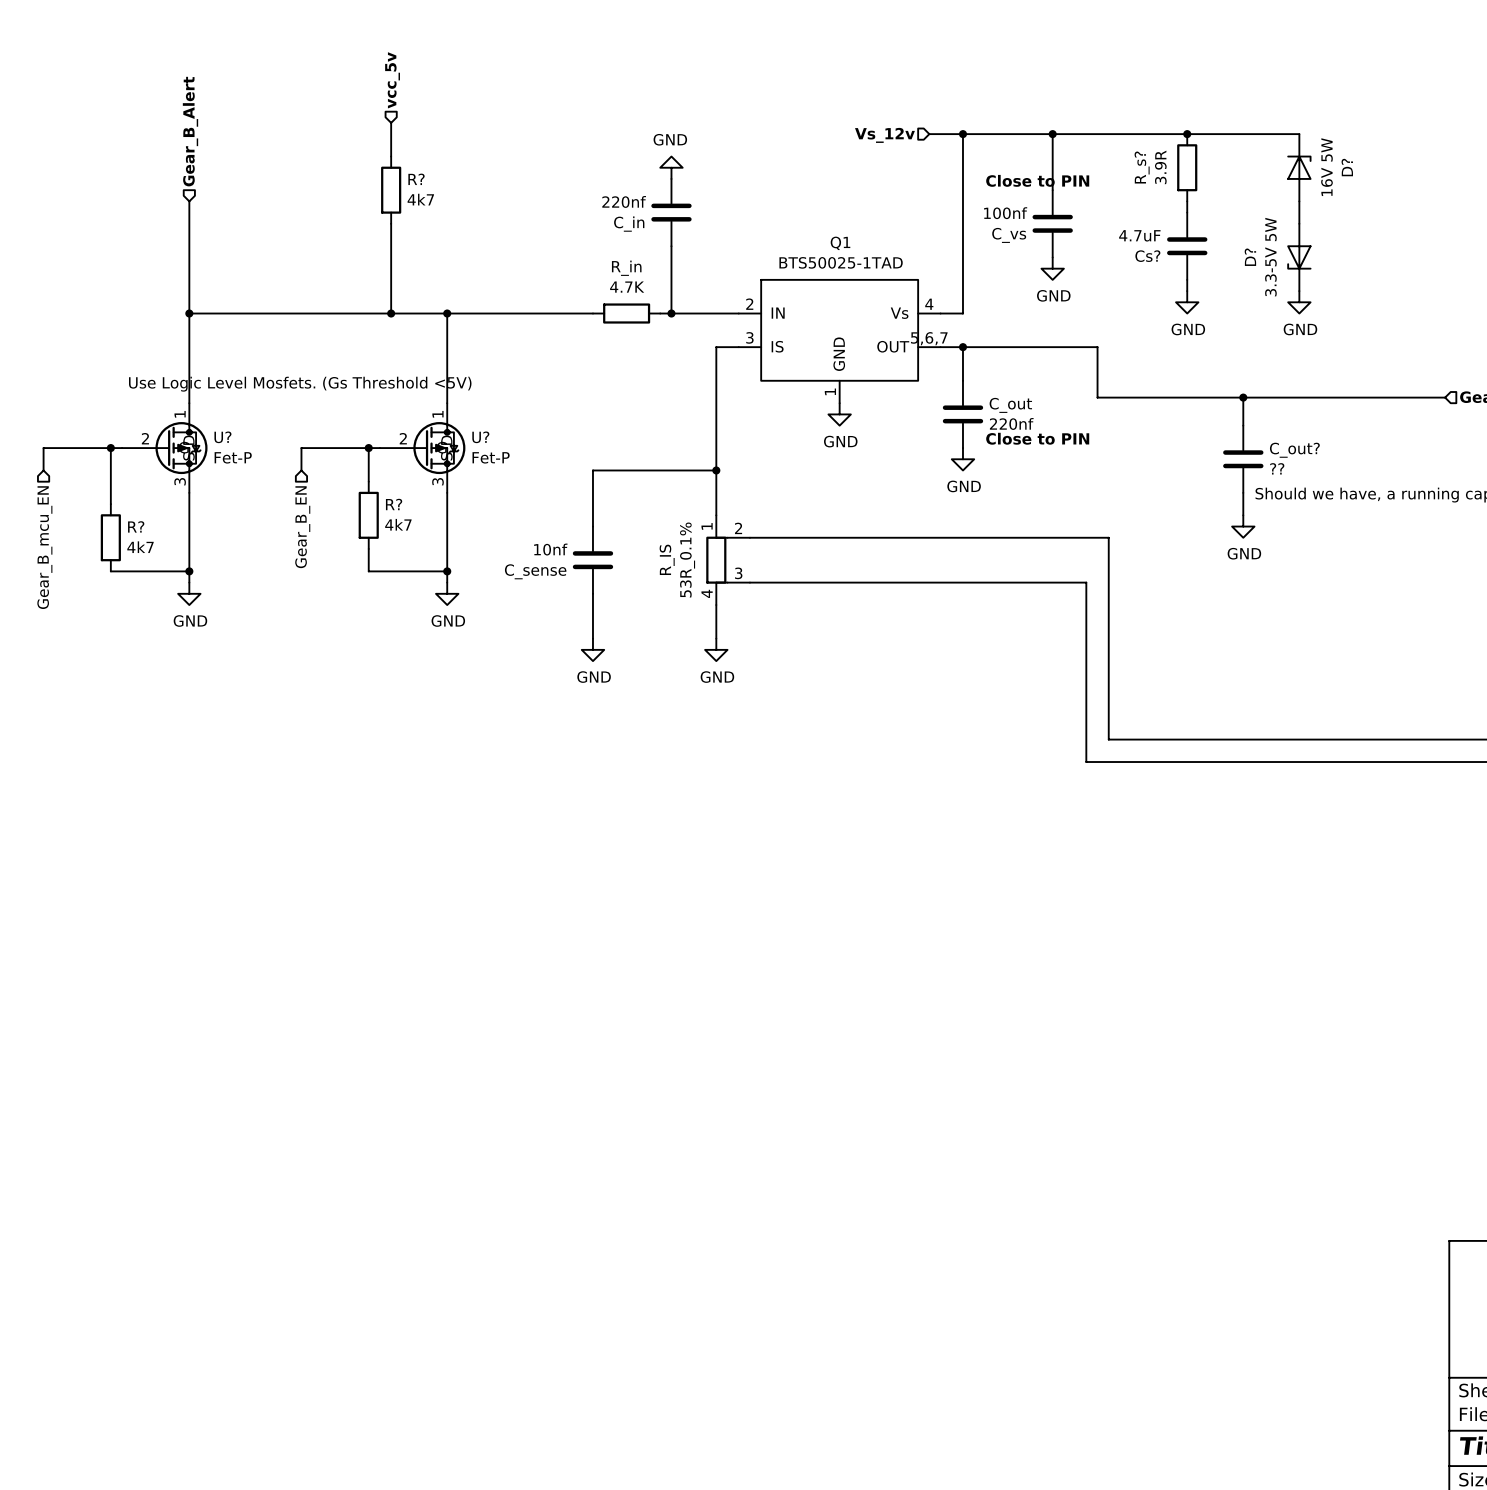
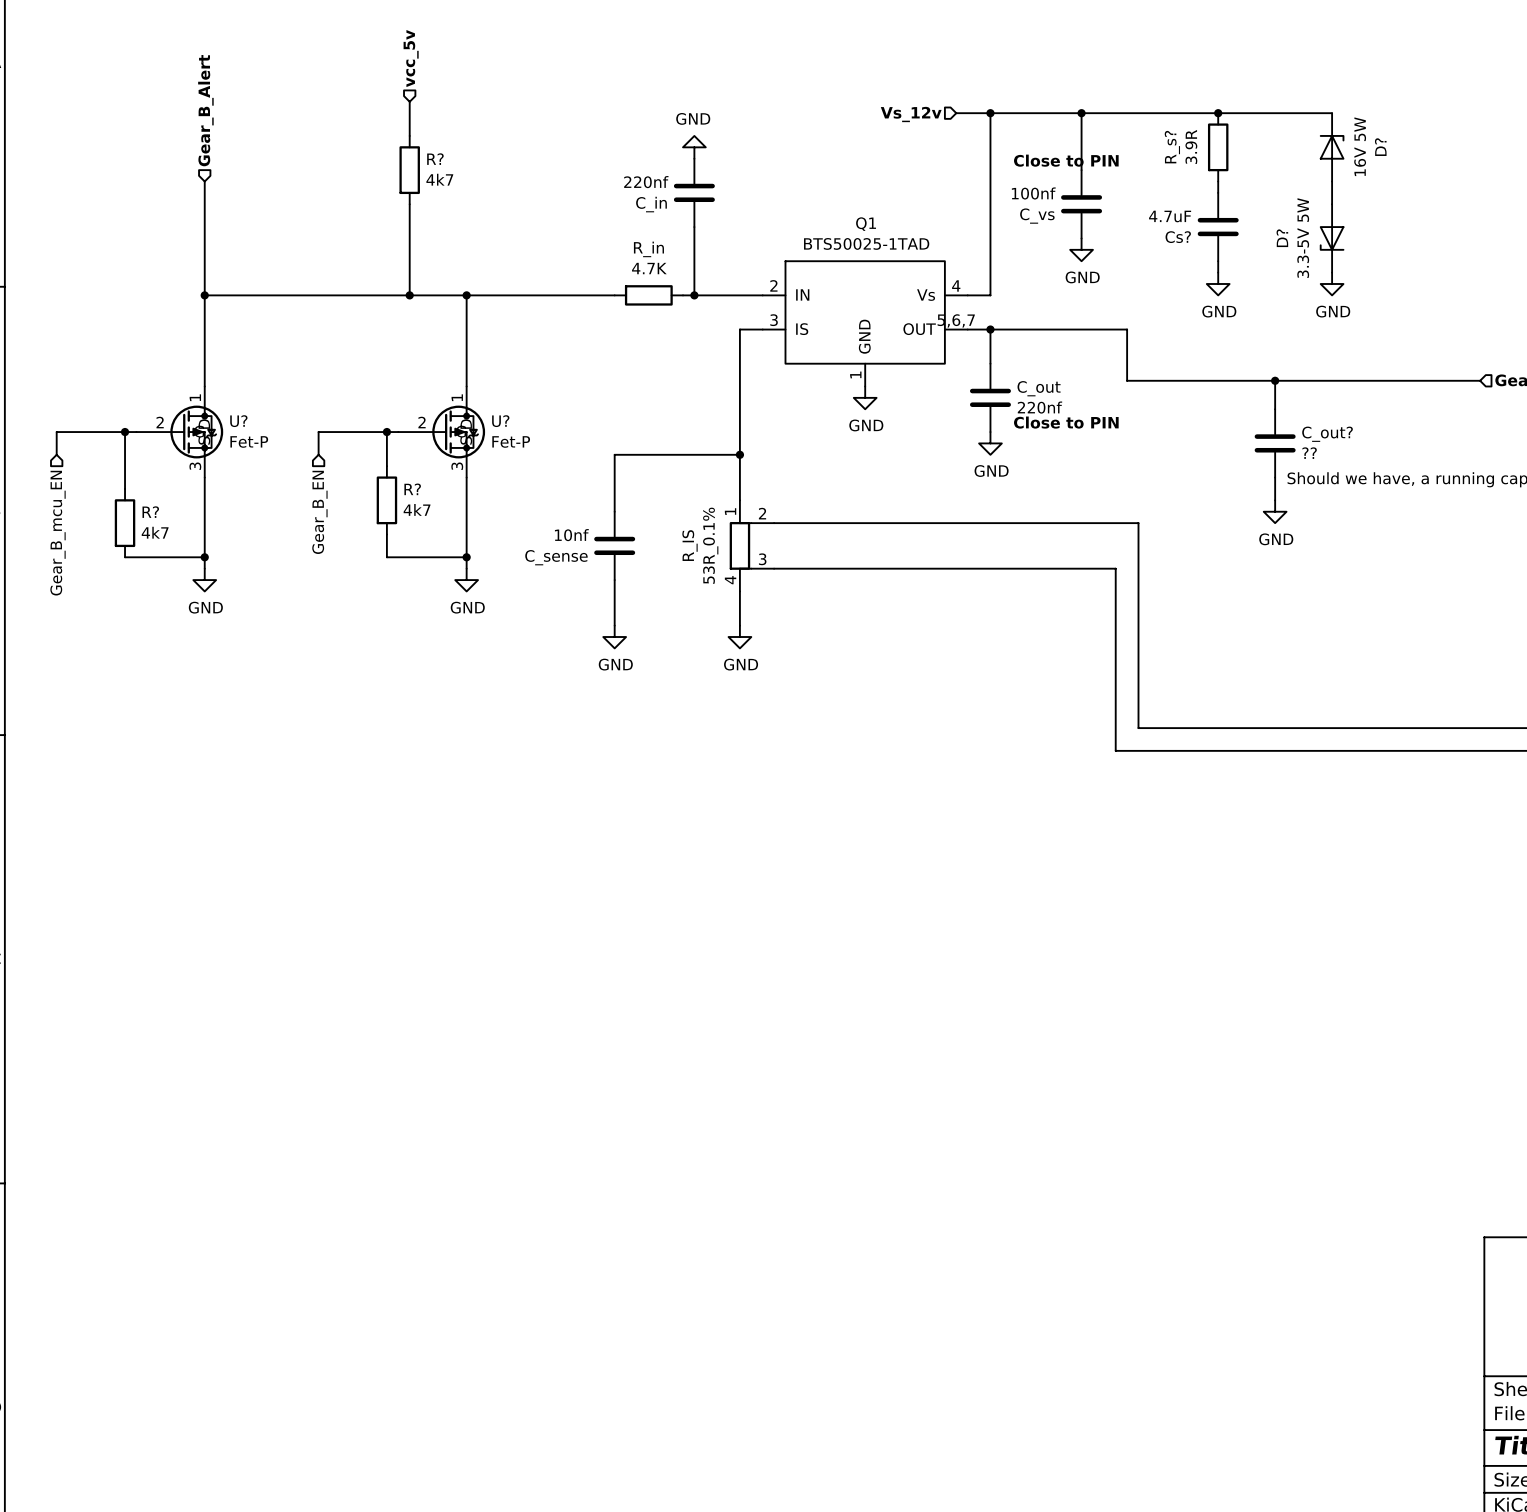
text: Use Logic Level Mosfets. (Gs Threshold <5V) (300, 384) -> none

